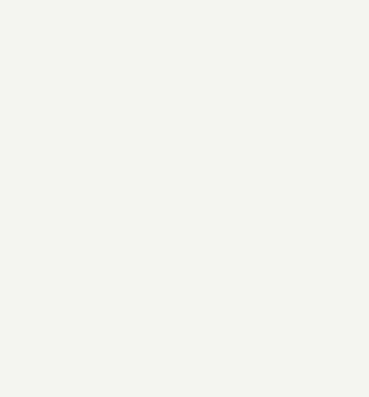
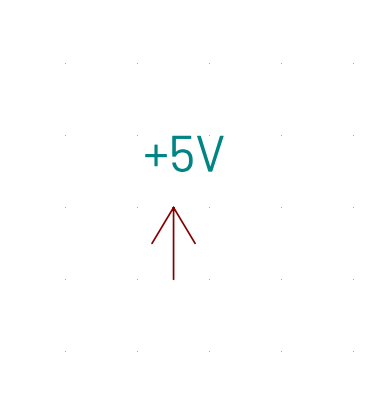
power symbol: none -> +5V (173, 243)

